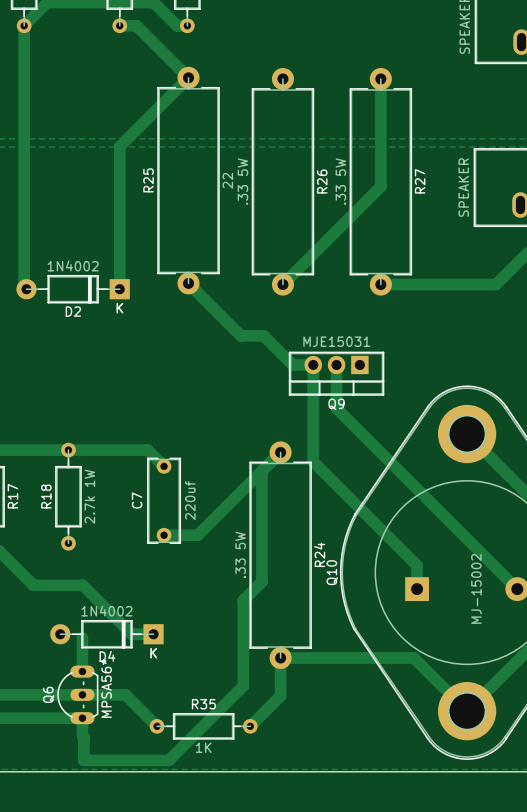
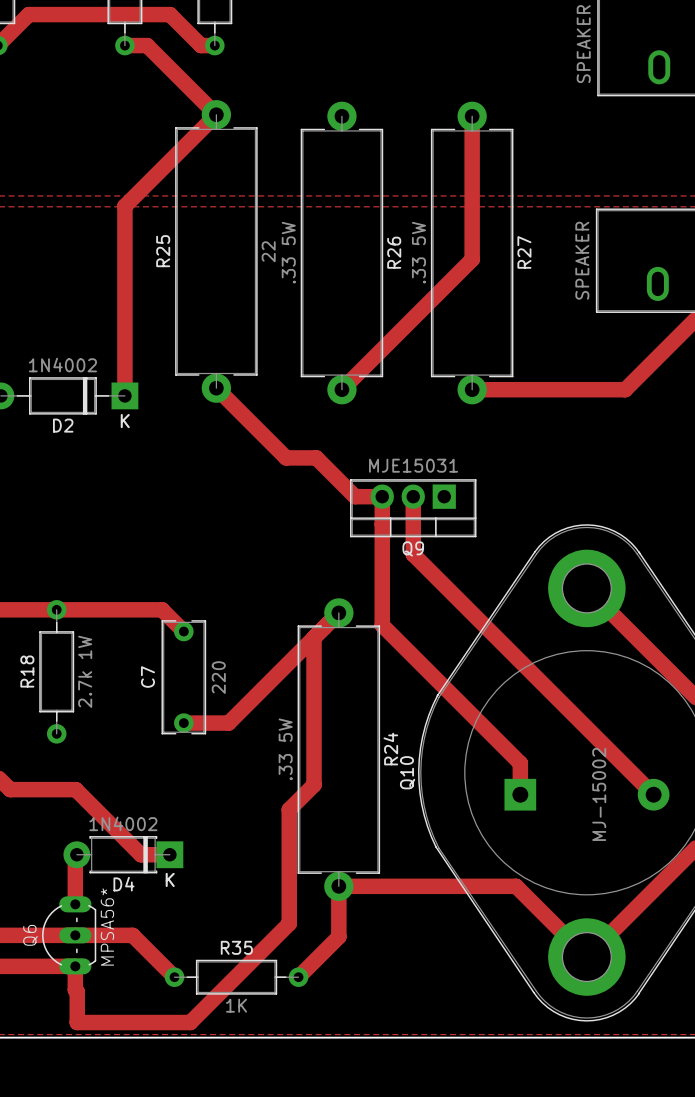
C7 value: 220uf (190, 500) -> 220 (218, 677)
D4 footprint: [50, 620, 164, 649] -> [63, 836, 184, 874]

